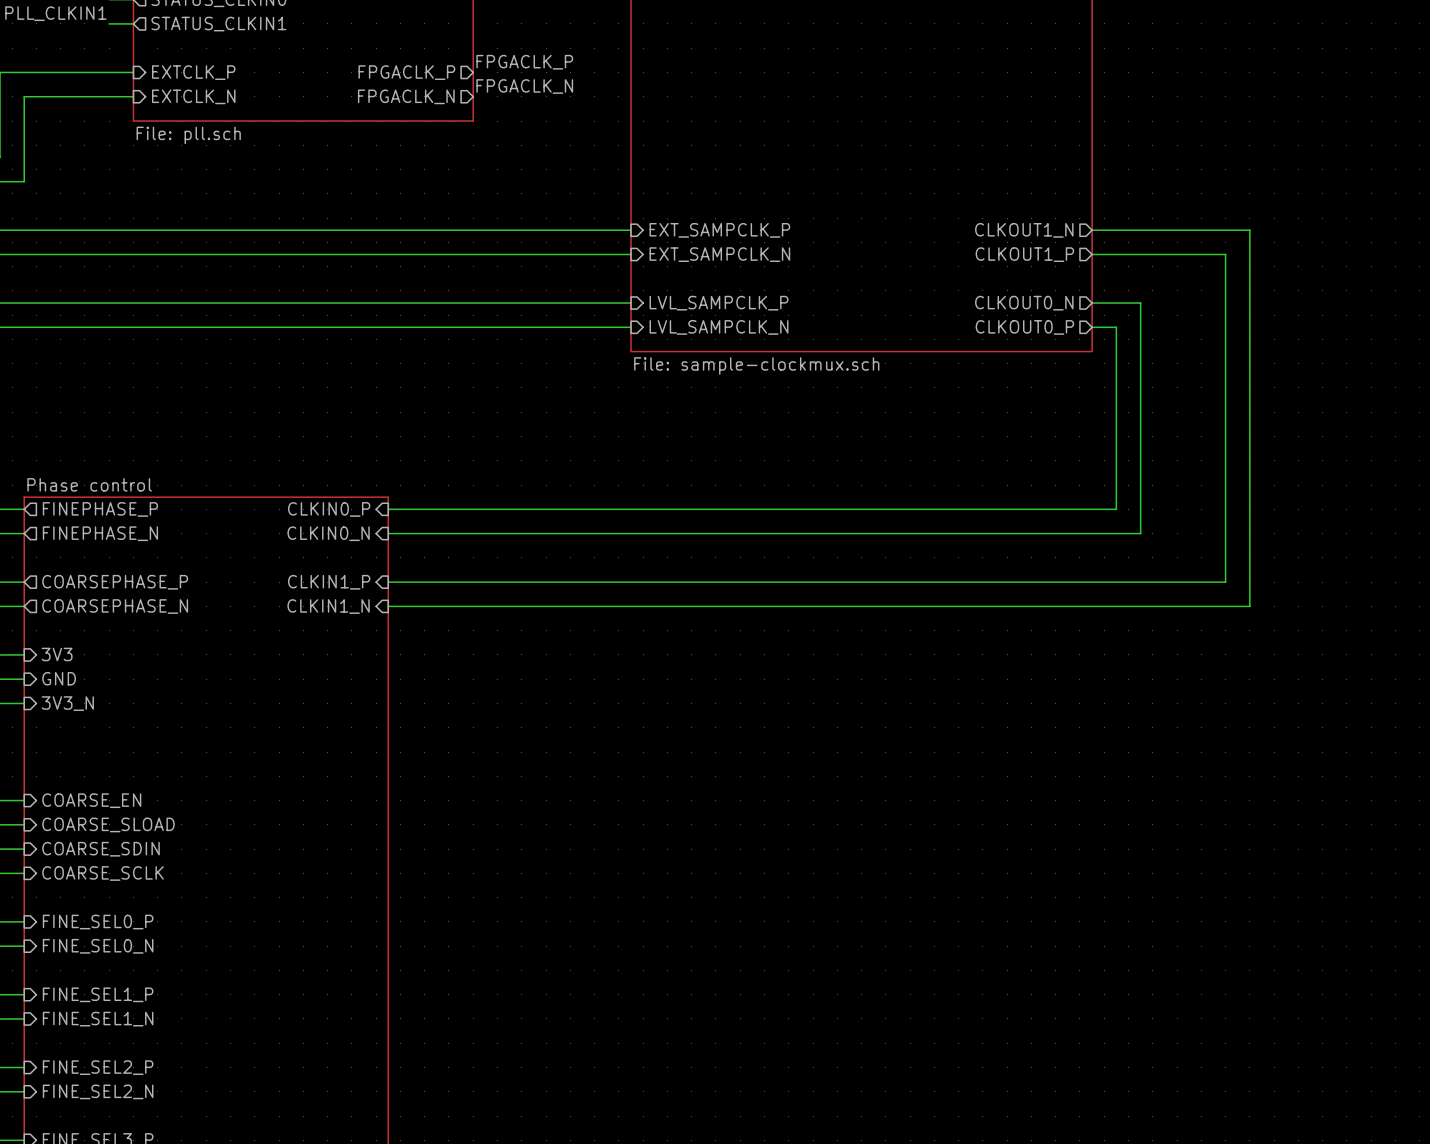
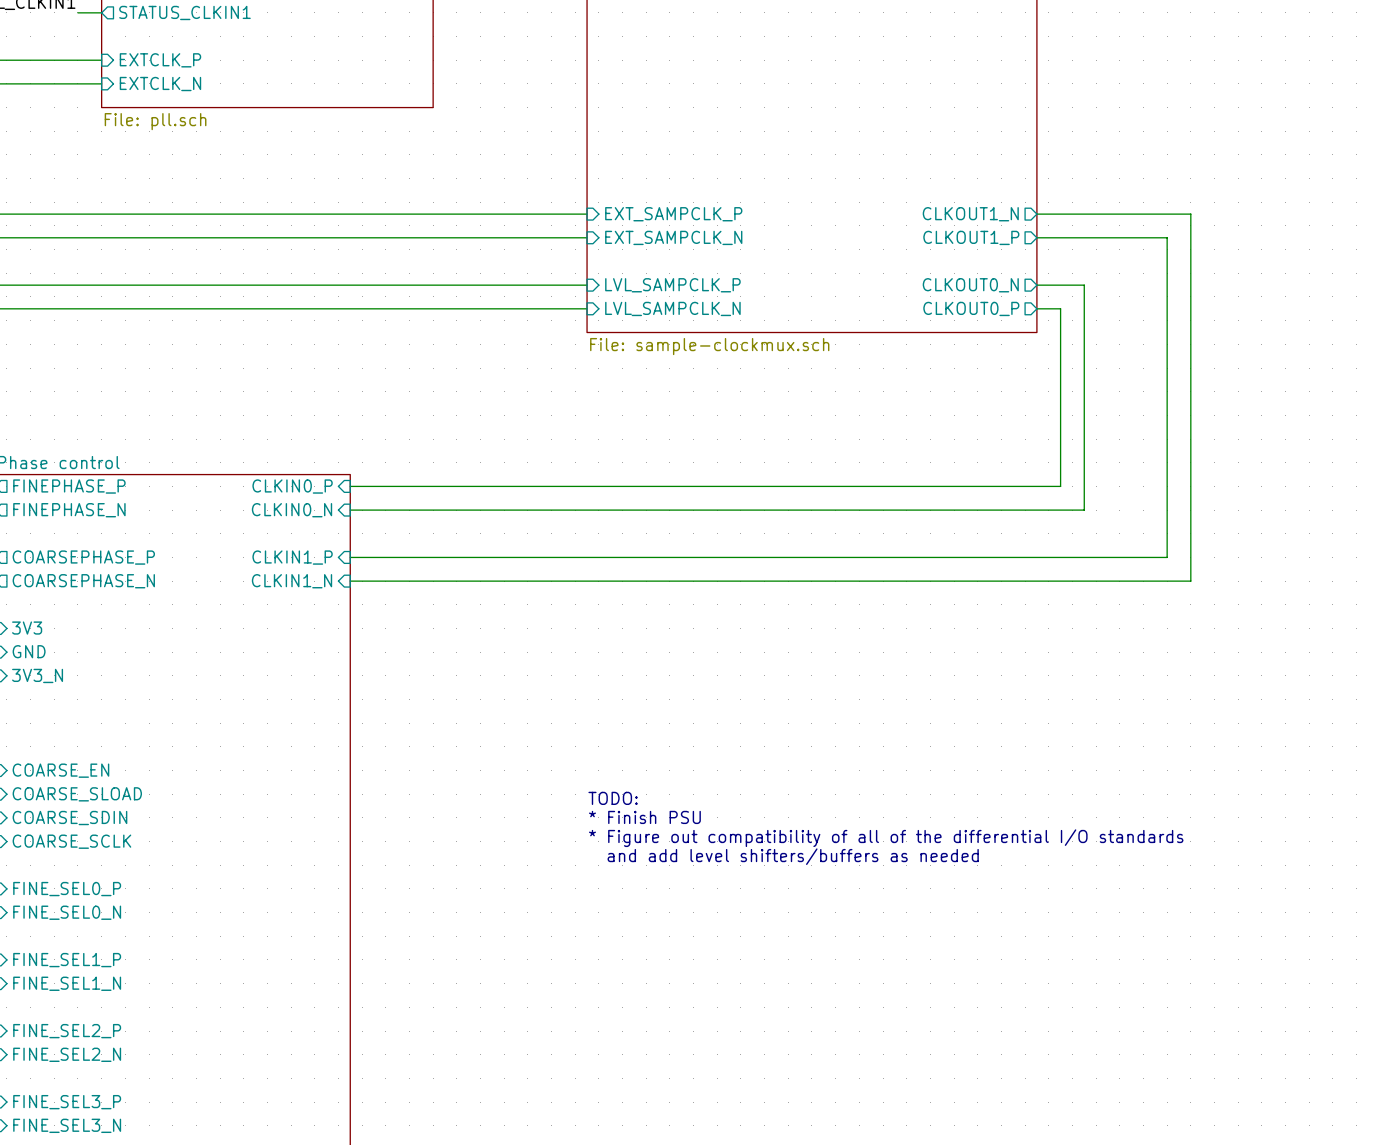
label: FPGACLK_P (524, 62) -> none
sheet pin: FPGACLK_P (406, 72) -> none
label: FPGACLK_N (524, 86) -> none
sheet pin: FPGACLK_N (406, 96) -> none
text: none -> TODO: (613, 798)
text: none -> * Finish PSU (644, 817)
text: none -> * Figure out compatibility of all of the differential I/O standards (886, 838)
text: none -> and add level shifters/buffers as needed (793, 856)

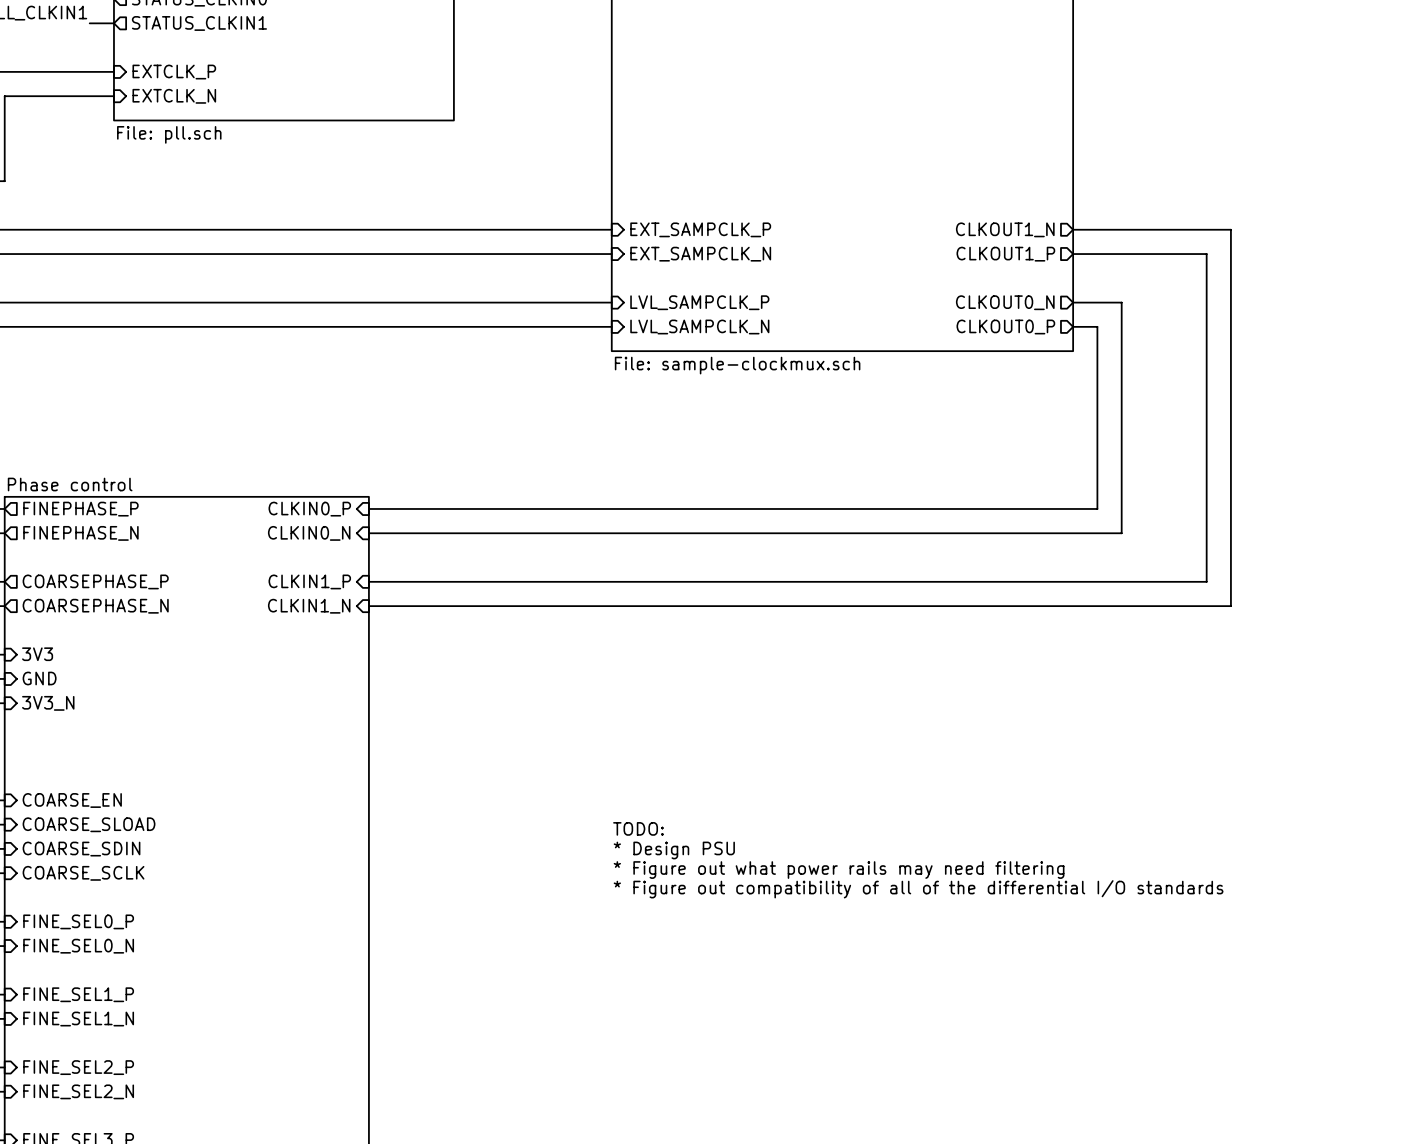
text: * Finish PSU (644, 817) -> * Design PSU (674, 850)
text: * Figure out compatibility of all of the differential I/O standards (886, 838) -> * Figure out what power rails may need filtering (839, 870)
text: and add level shifters/buffers as needed (793, 856) -> * Figure out compatibility of all of the differential I/O standards (918, 889)

